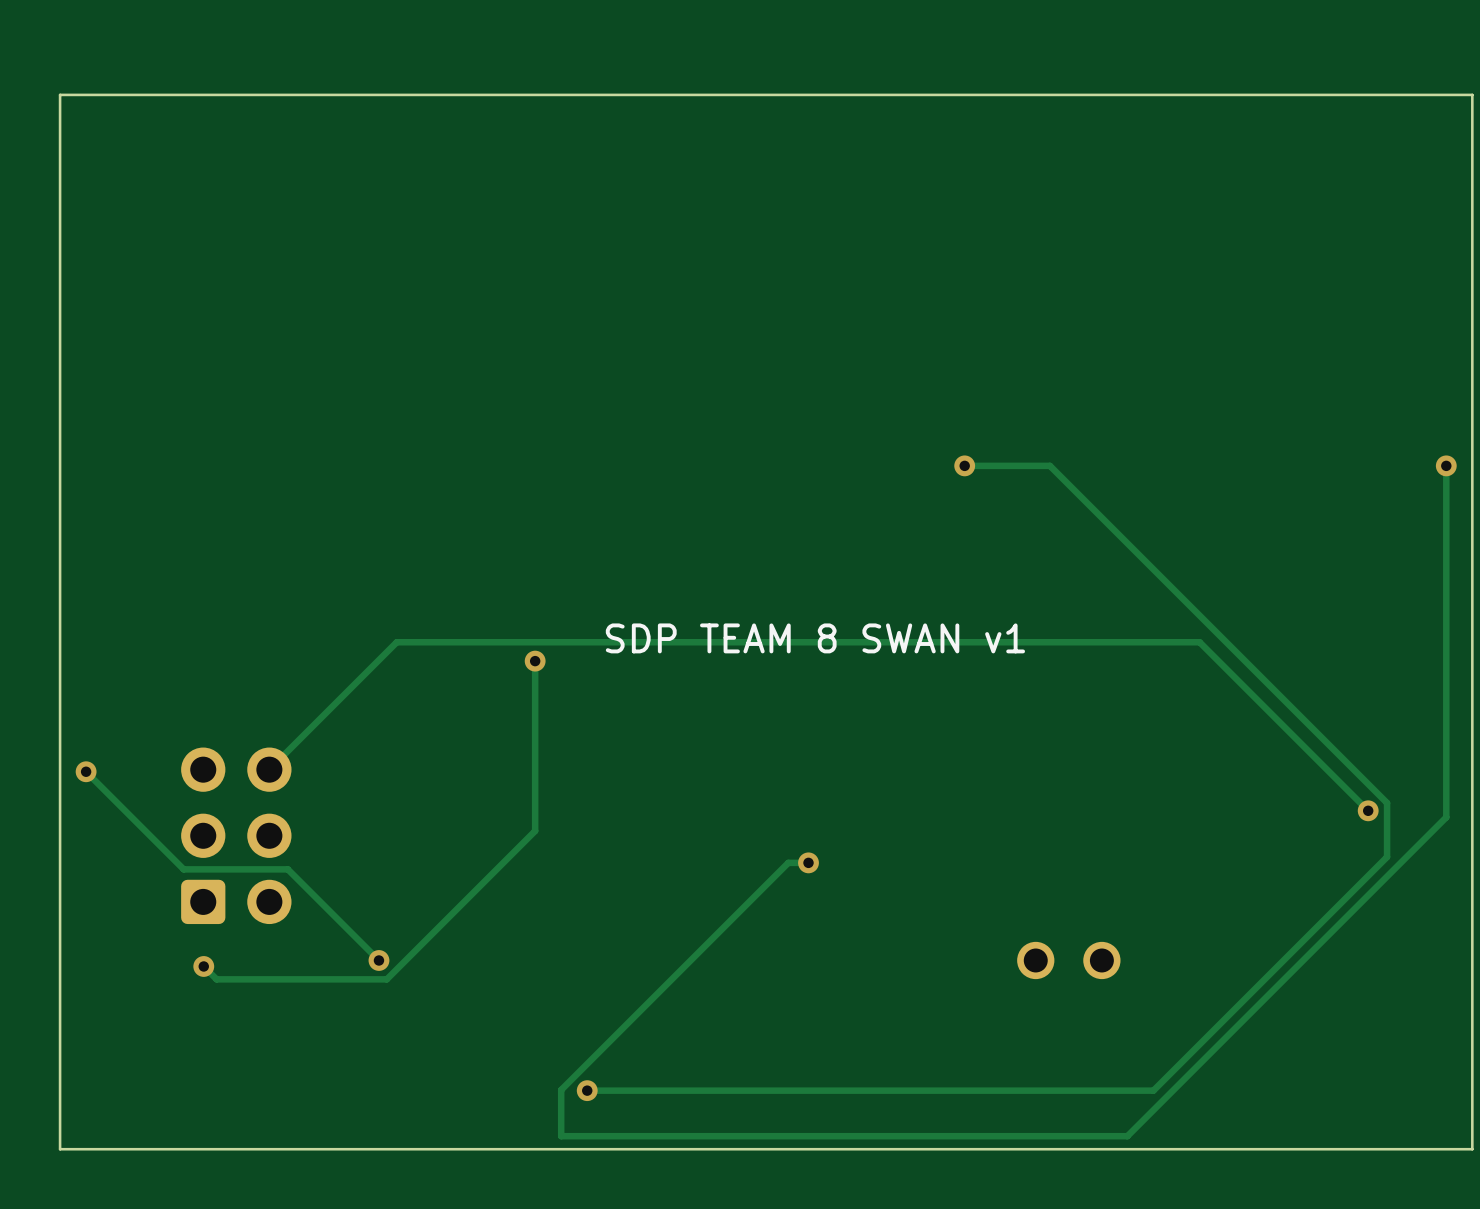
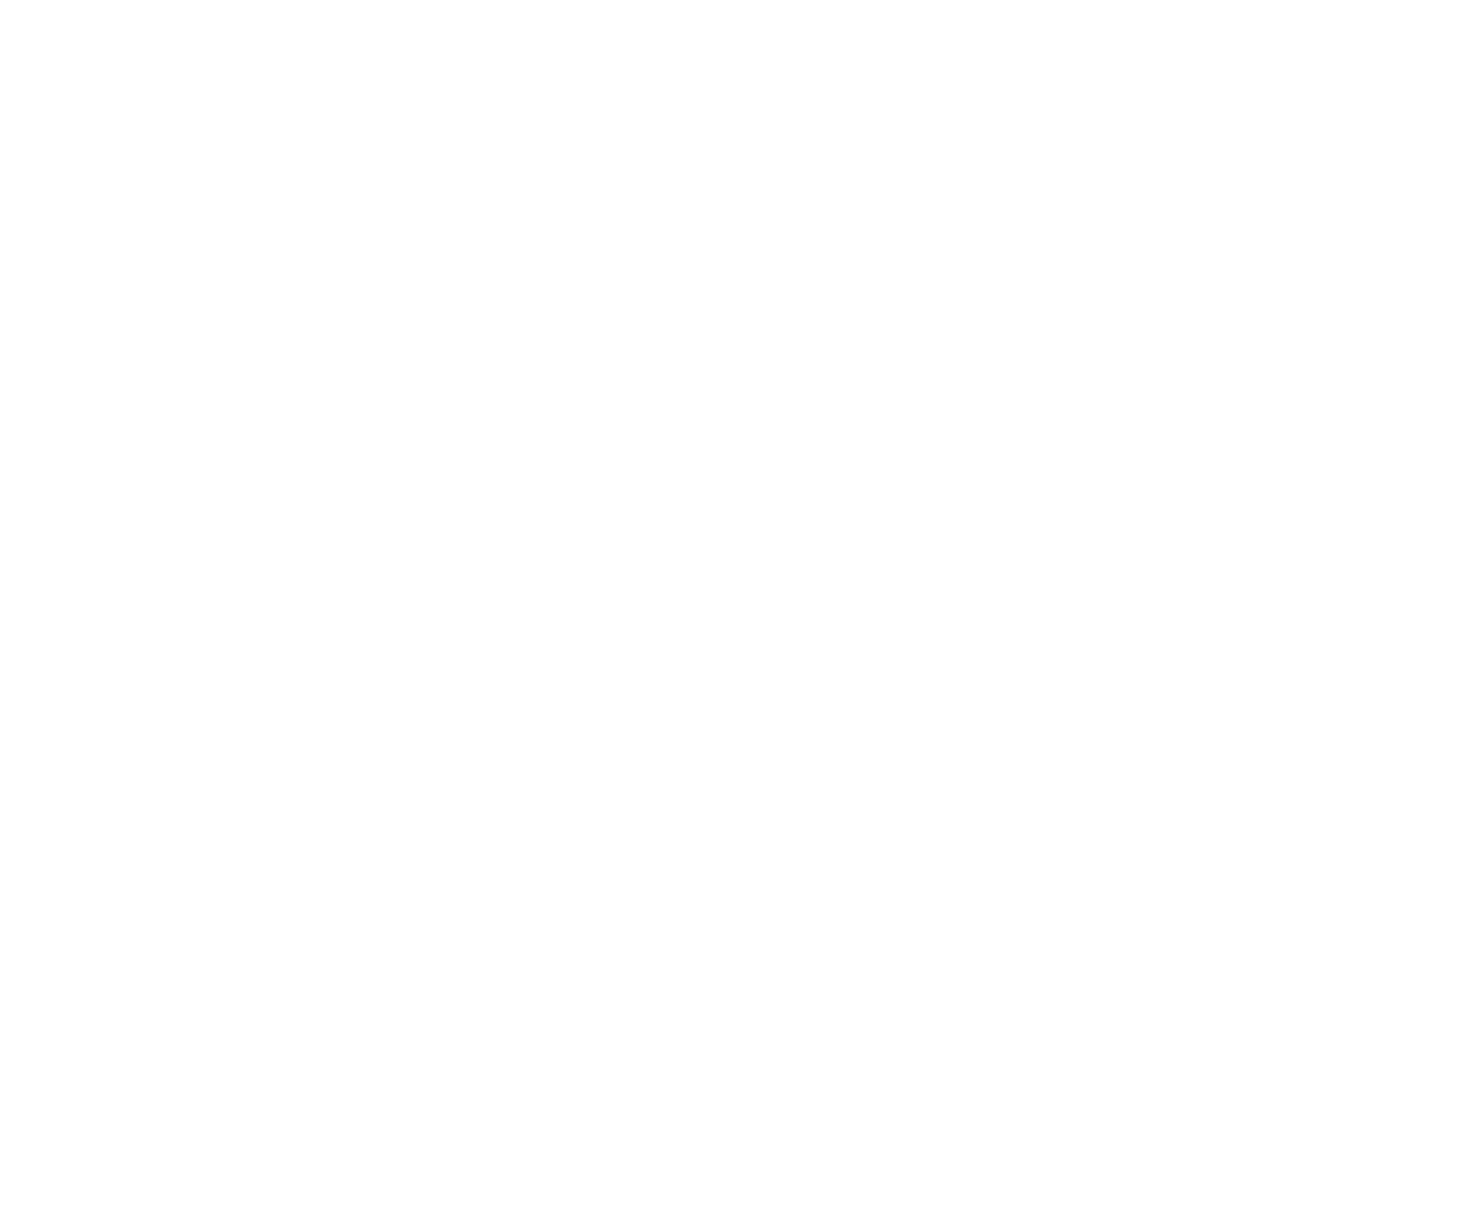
board edge: (1472, 94) (60, 94) (60, 1149) (1472, 1149) (1472, 94) -> none
track: (964, 465) (1049, 465) (1387, 802) (1387, 857) (1153, 1090) (587, 1090) -> none
via: (964, 465) -> none
track: (1446, 465) (1446, 817) (1127, 1136) (561, 1136) (561, 1089) (788, 862) (808, 862) -> none
via: (1446, 465) -> none
text: SDP TEAM 8 SWAN v1 (815, 638) -> none
track: (535, 661) (535, 830) (386, 979) (216, 979) (203, 966) -> none
via: (535, 661) -> none
track: (269, 769) (396, 642) (1199, 642) (1368, 810) -> none
track: (86, 771) (183, 869) (287, 869) (378, 960) -> none
via: (86, 771) -> none
via: (1368, 810) -> none
part: (236, 835) -> none
via: (808, 862) -> none
via: (378, 960) -> none
part: (1068, 960) -> none
via: (203, 966) -> none
via: (587, 1090) -> none

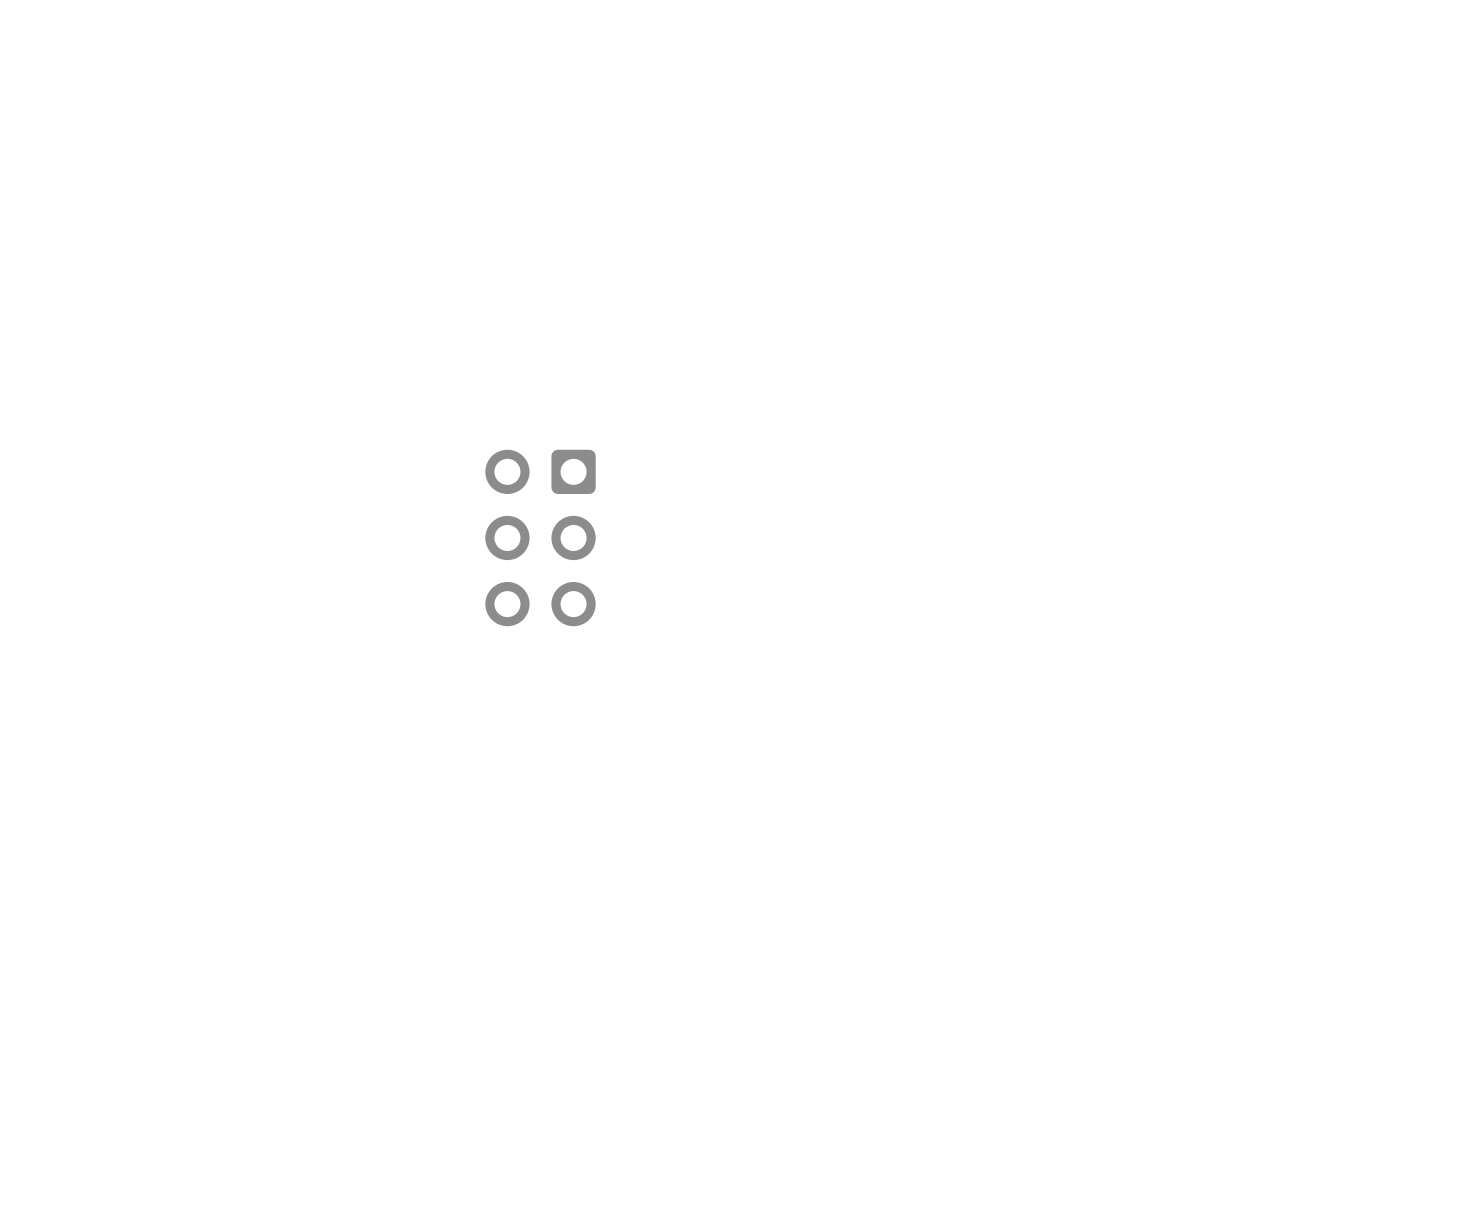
part: none -> (540, 537)

